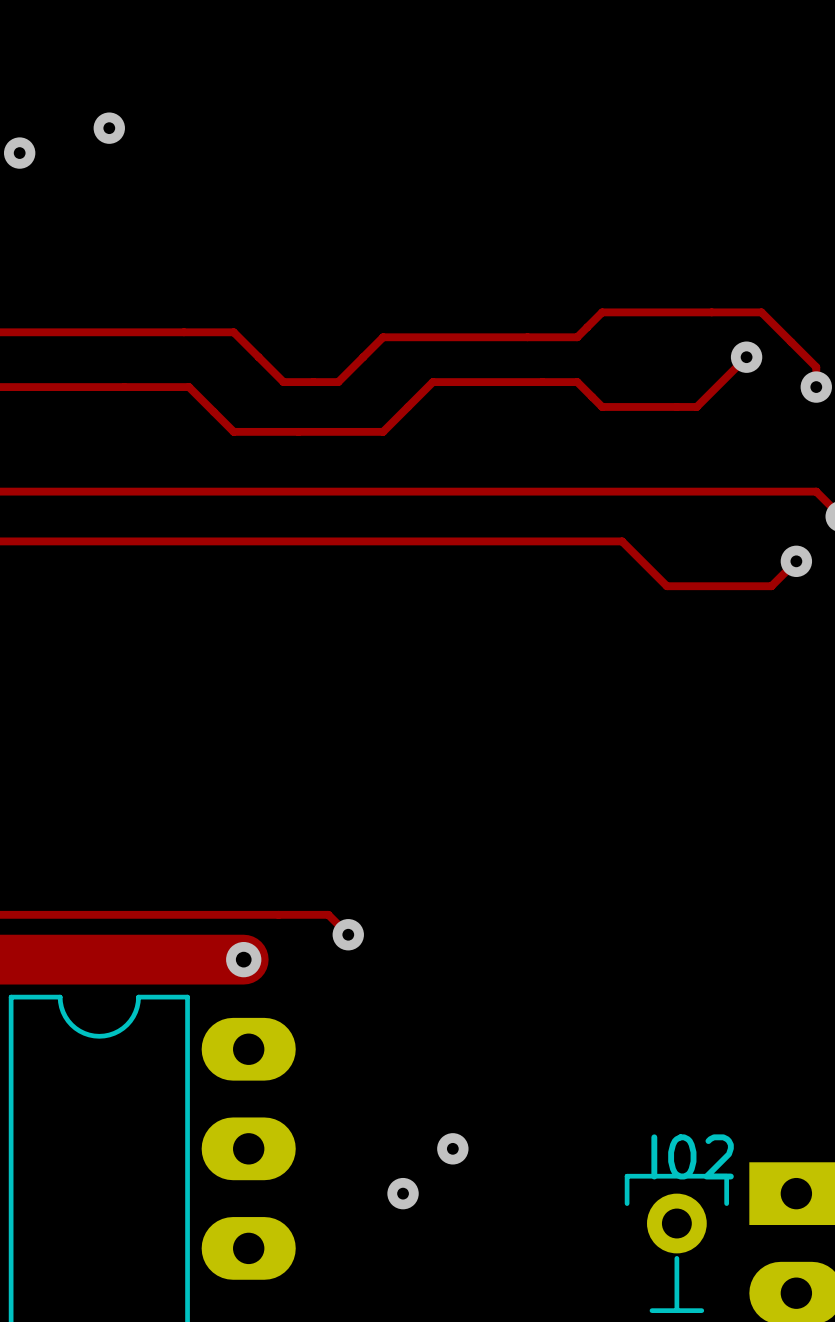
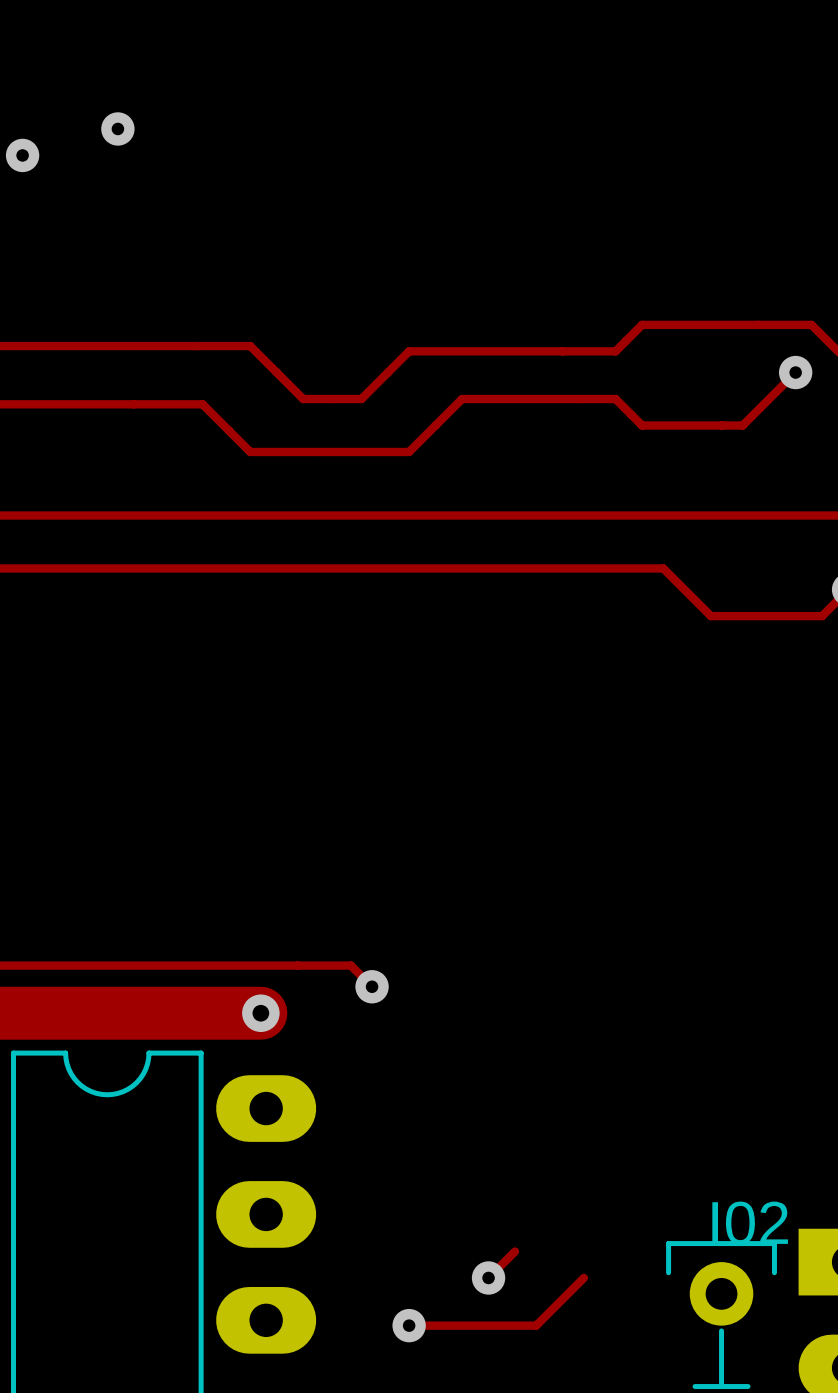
via: (452, 1148) -> none
track: none -> (515, 1251) (488, 1277)
via: (403, 1193) -> none
via: none -> (488, 1277)
track: none -> (583, 1277) (536, 1325) (409, 1325)
via: none -> (409, 1325)

